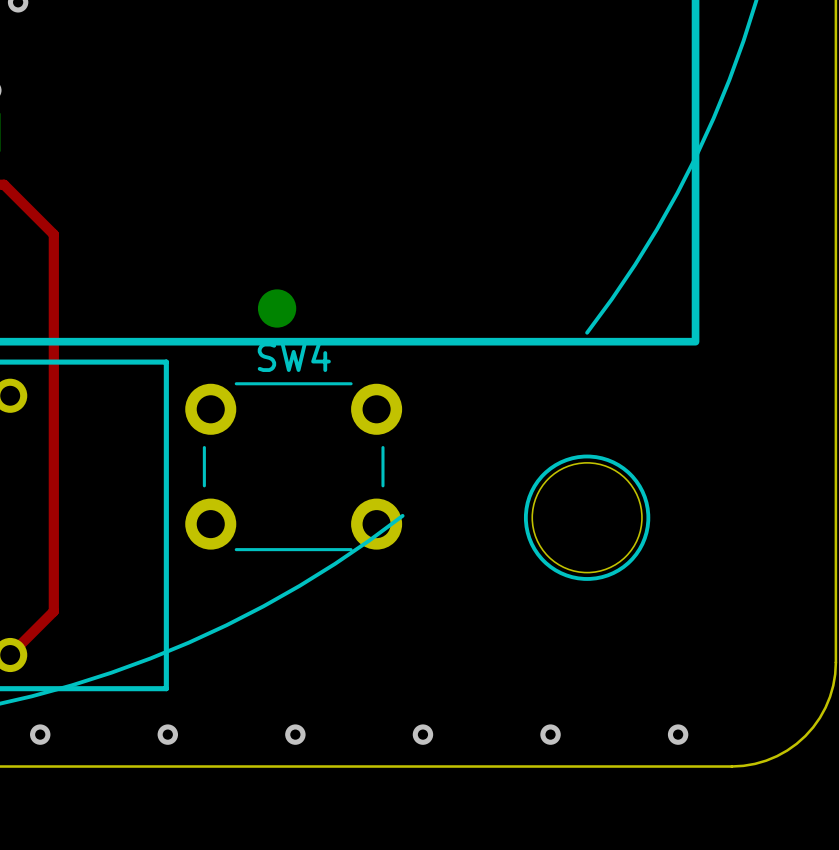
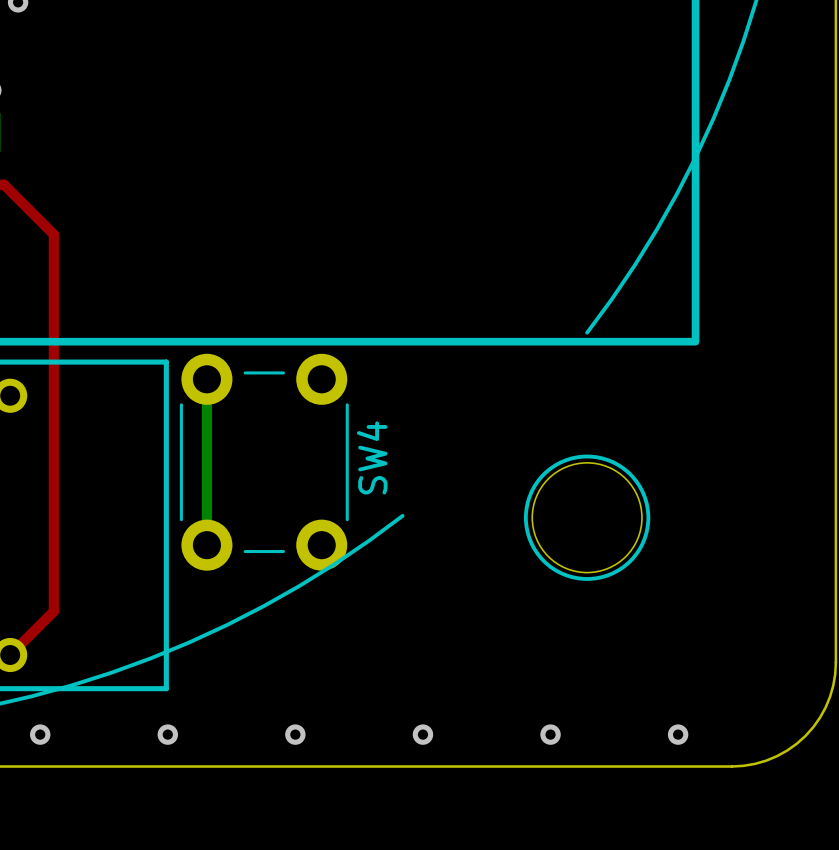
part: (277, 308) -> none
bottom track: none -> (206, 379) (206, 545)
SW4 rotation: 0° (293, 466) -> 90° clockwise (264, 462)

